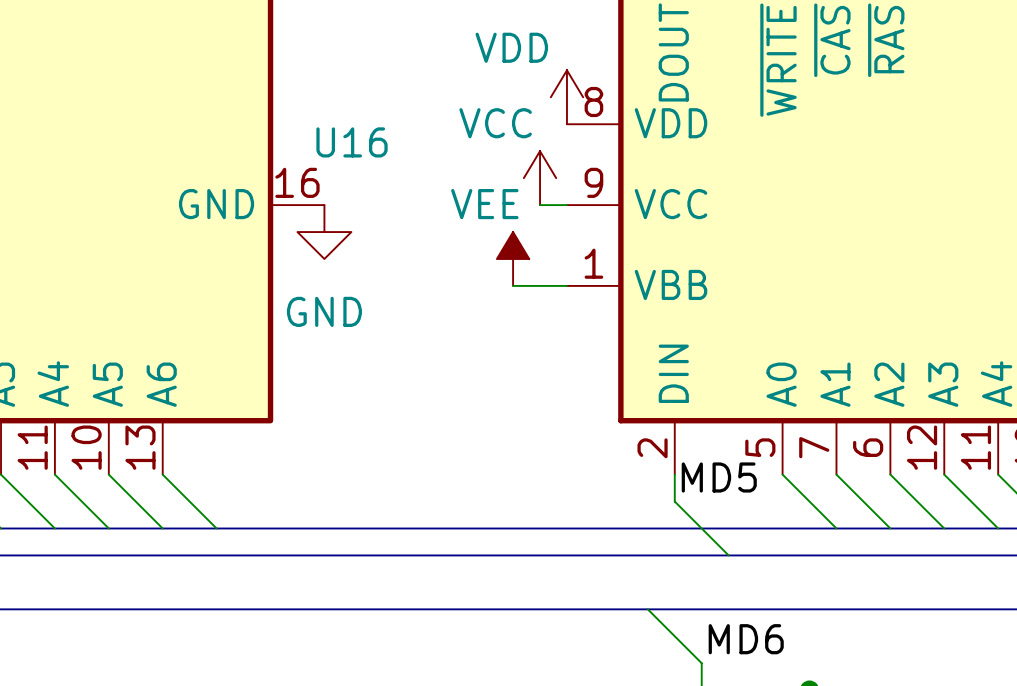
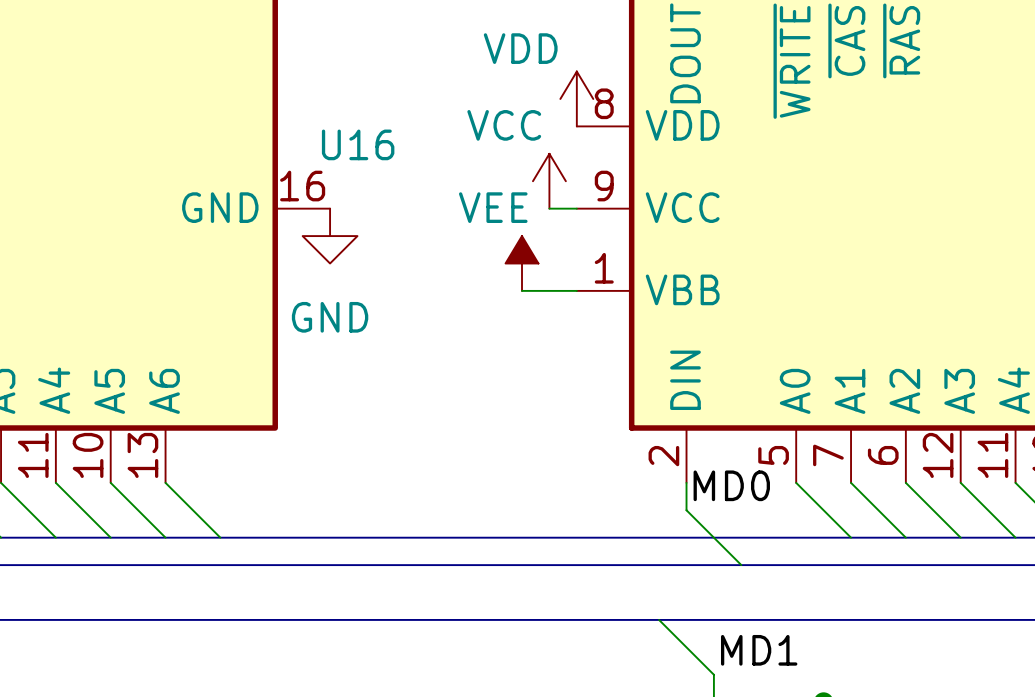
label: MD5 (719, 477) -> MD0 (731, 485)
label: MD6 (746, 639) -> MD1 (759, 650)

